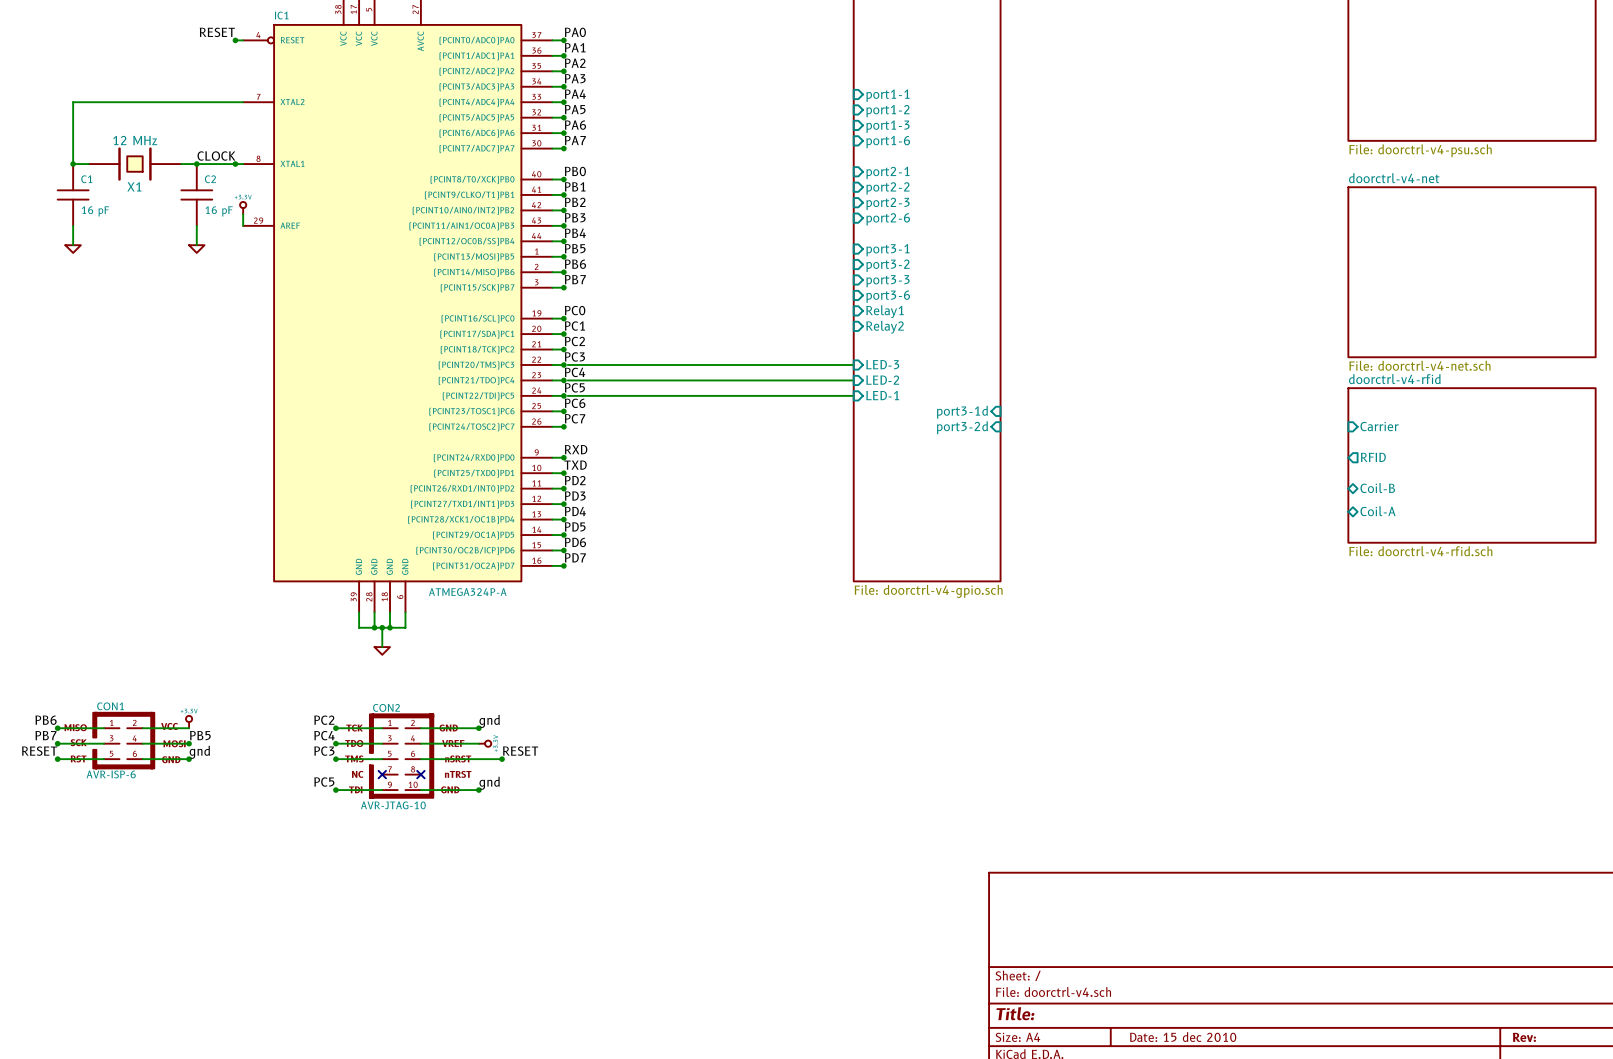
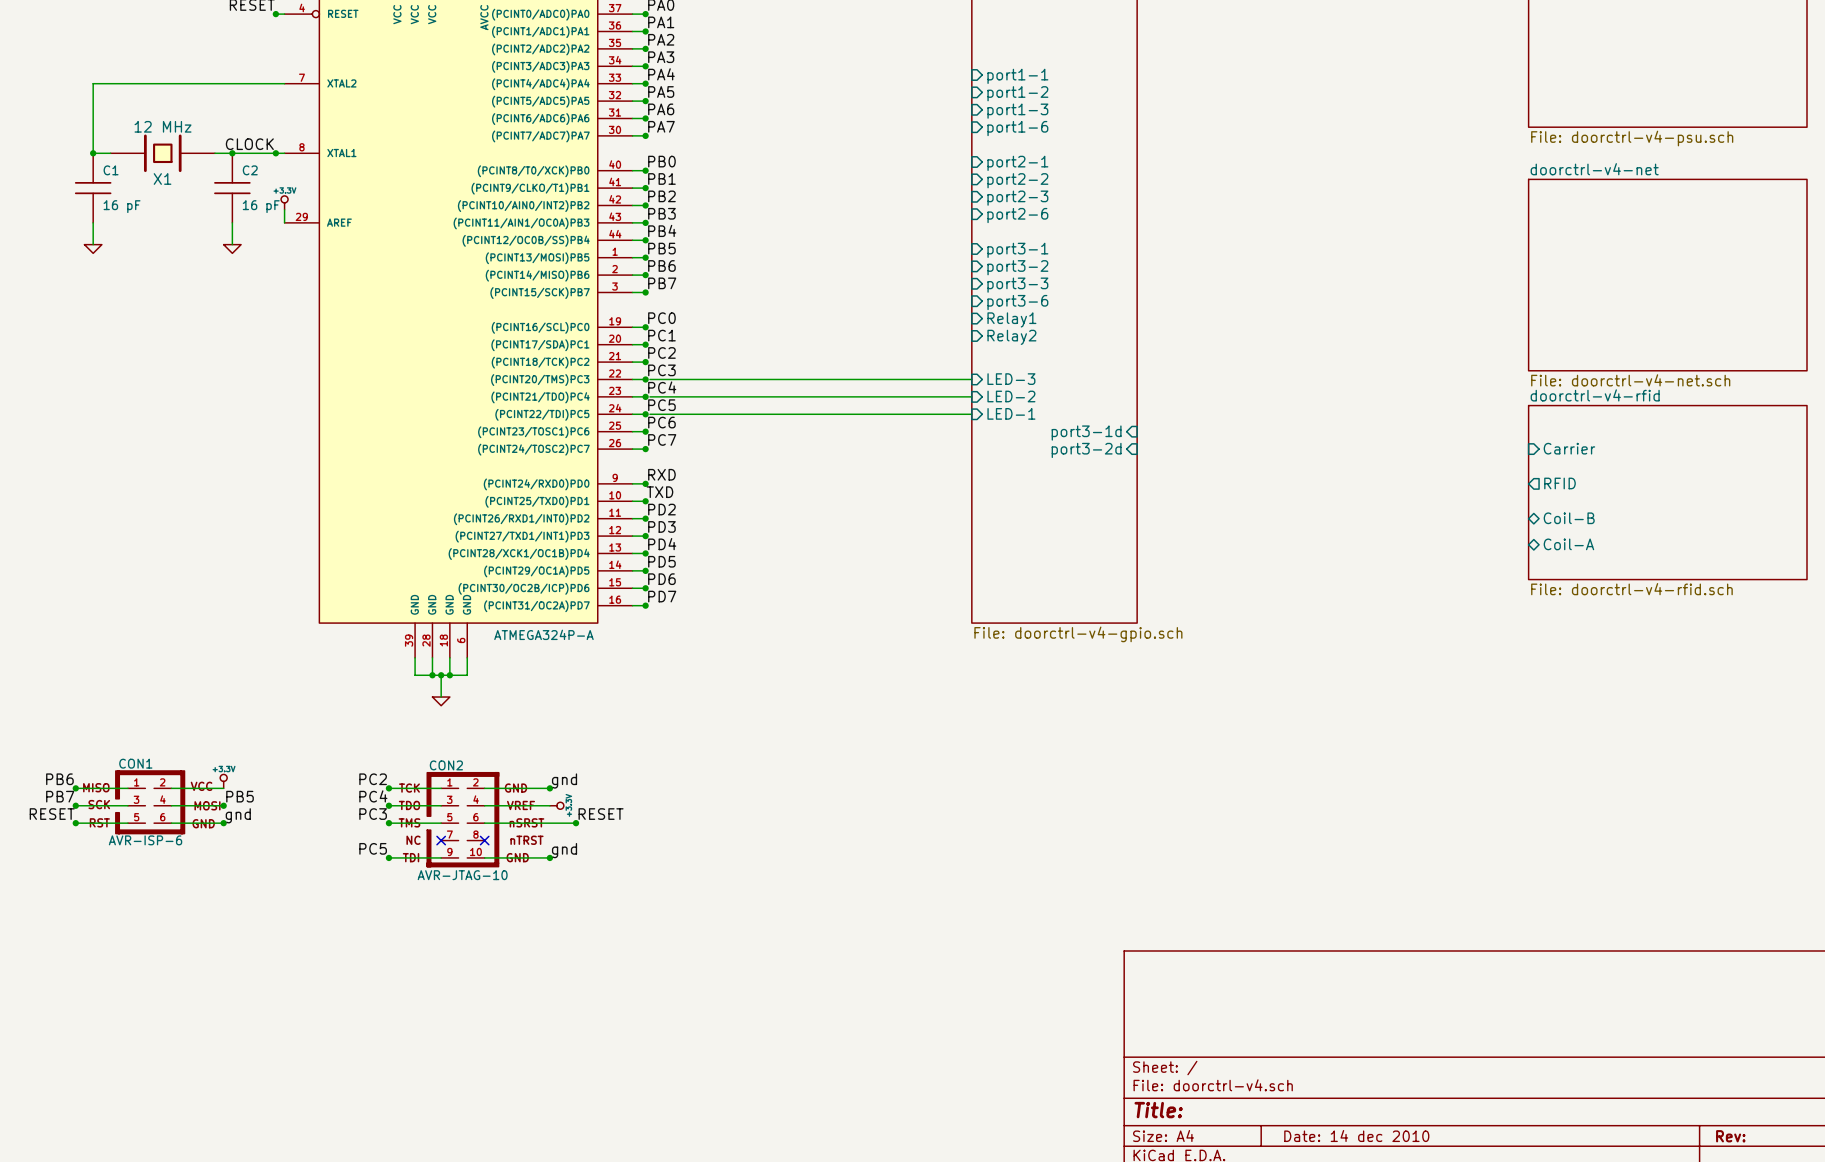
title block: Date: 15 dec 2010 (1183, 1037) -> Date: 14 dec 2010 (1356, 1136)

